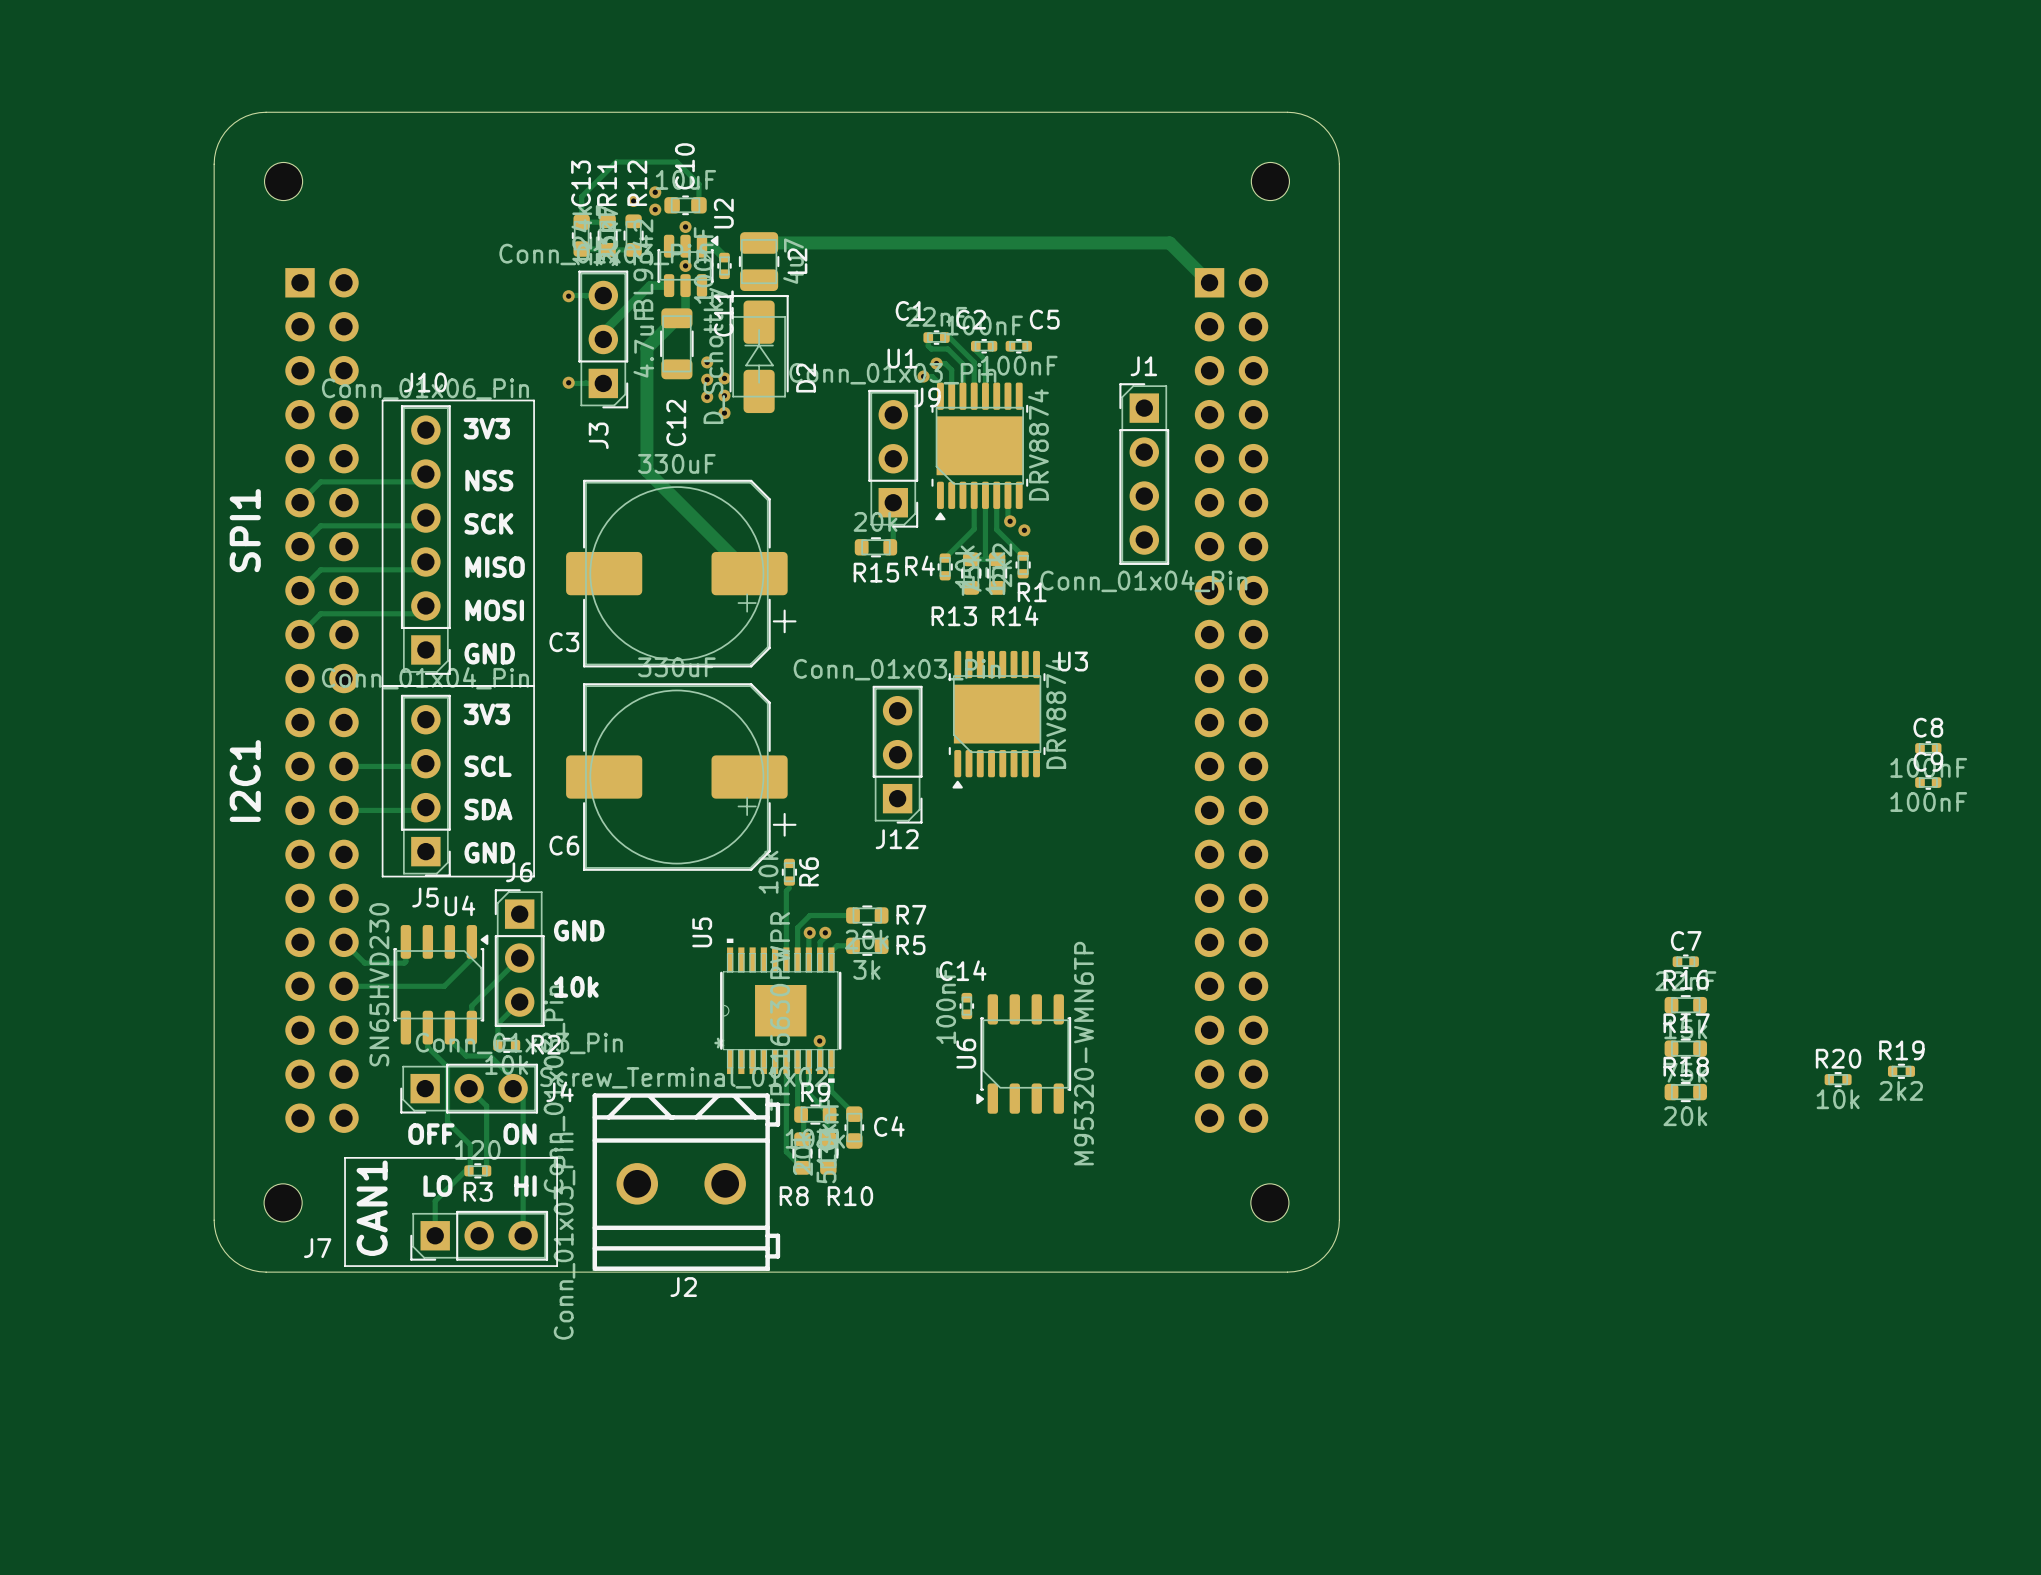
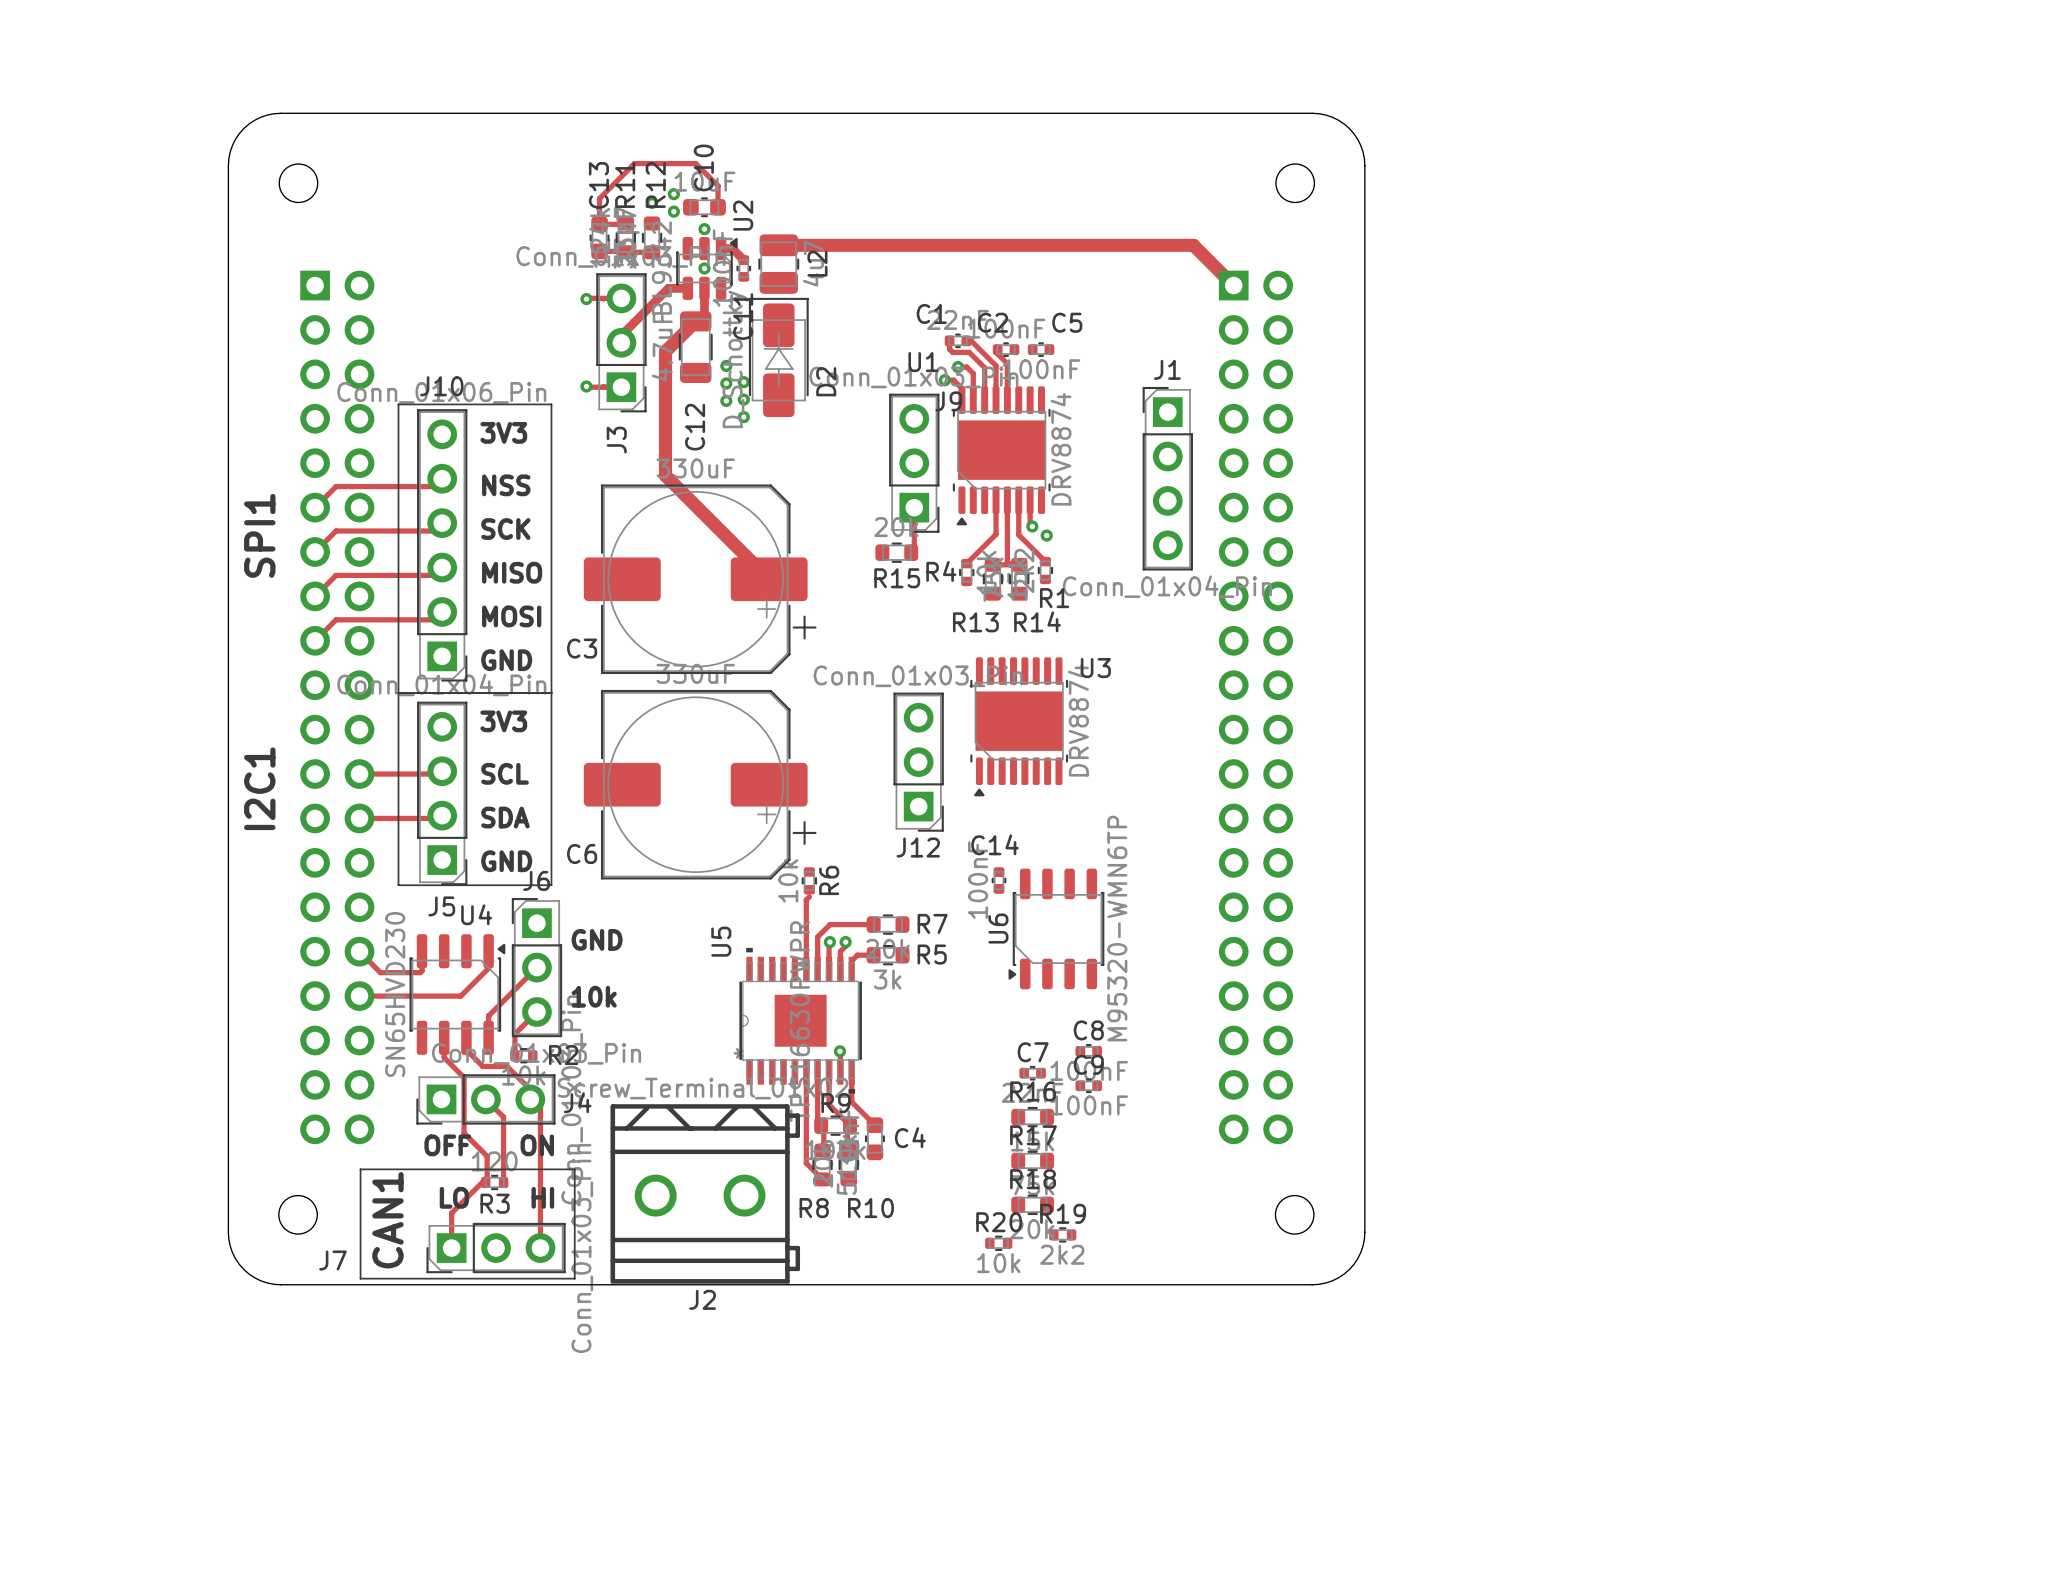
C8 position: (1928, 748) -> (1088, 1051)
C9 position: (1928, 782) -> (1088, 1085)
C7 position: (1685, 961) -> (1032, 1073)
R16 position: (1685, 1005) -> (1032, 1117)
C14 position: (966, 1006) -> (999, 880)
R17 position: (1685, 1048) -> (1032, 1160)
U6 position: (1023, 1054) -> (1056, 928)
R19 position: (1901, 1071) -> (1062, 1234)
R20 position: (1838, 1079) -> (998, 1243)
R18 position: (1685, 1092) -> (1032, 1204)

